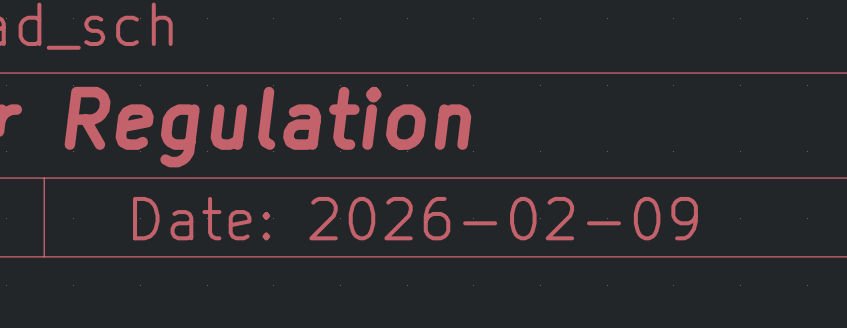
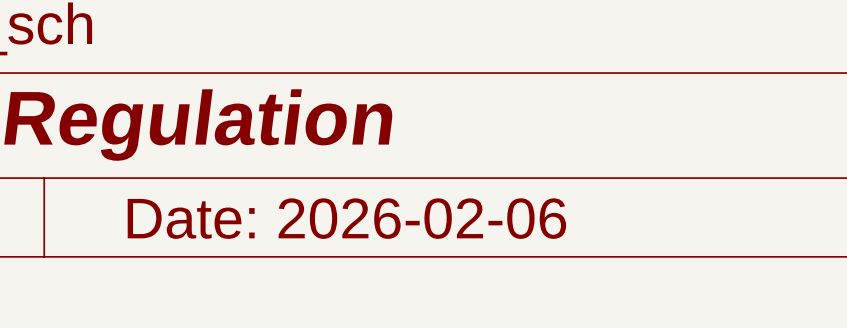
title block: Date: 2026-02-09 (415, 218) -> Date: 2026-02-06 (346, 218)

